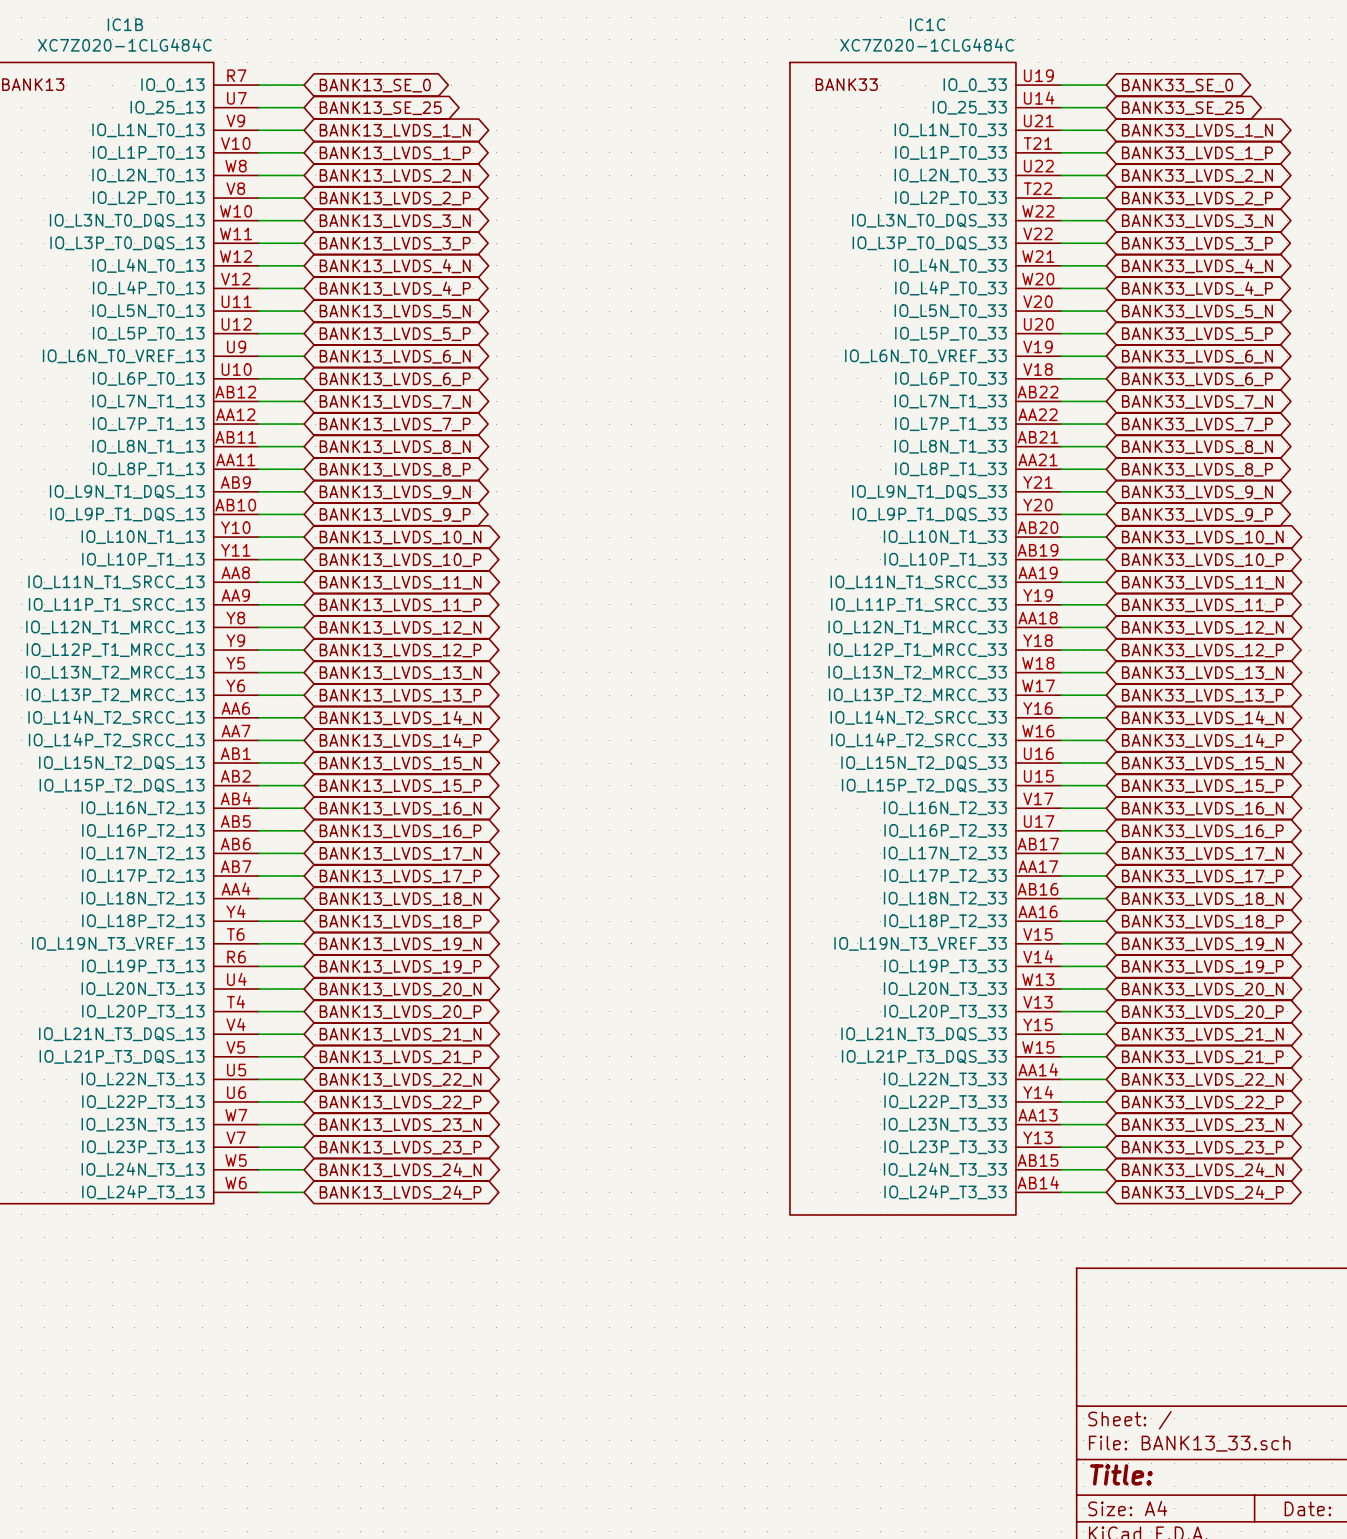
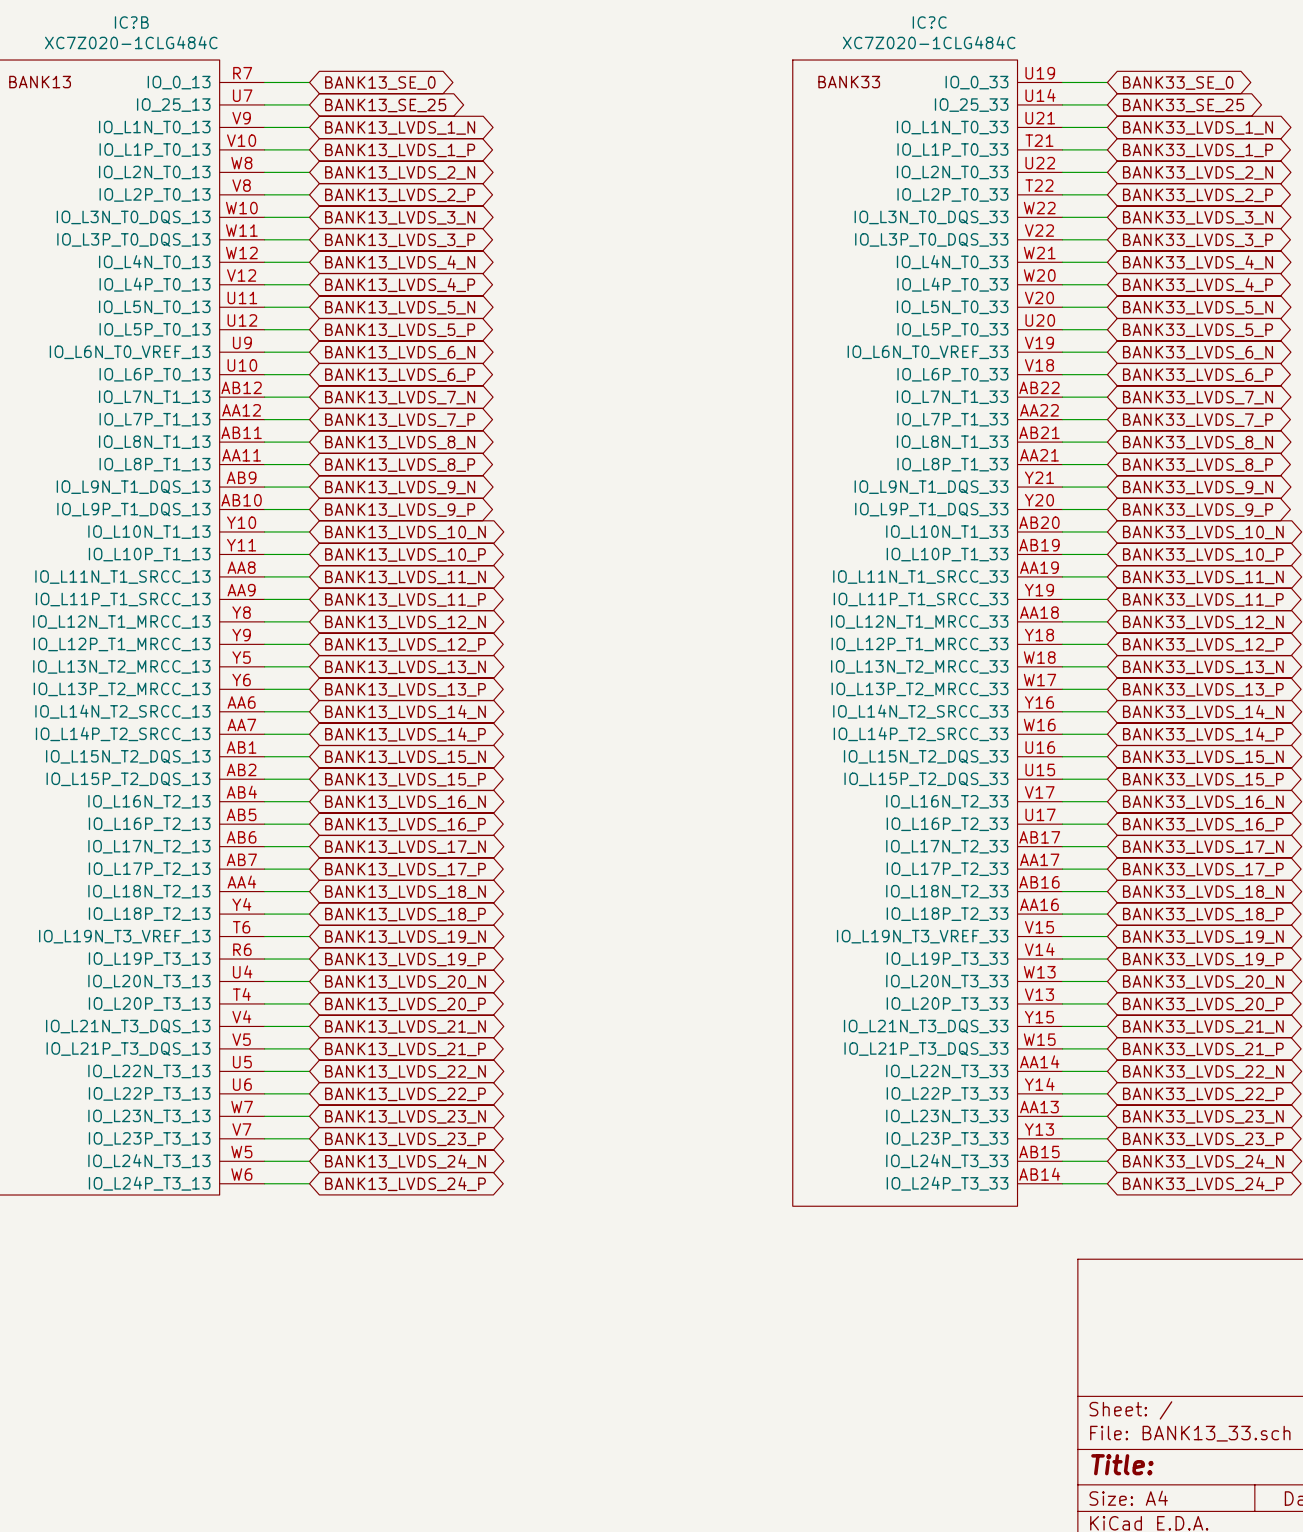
IC1B name: IC1B (125, 24) -> IC?B (131, 22)
IC1C name: IC1C (927, 24) -> IC?C (929, 22)

